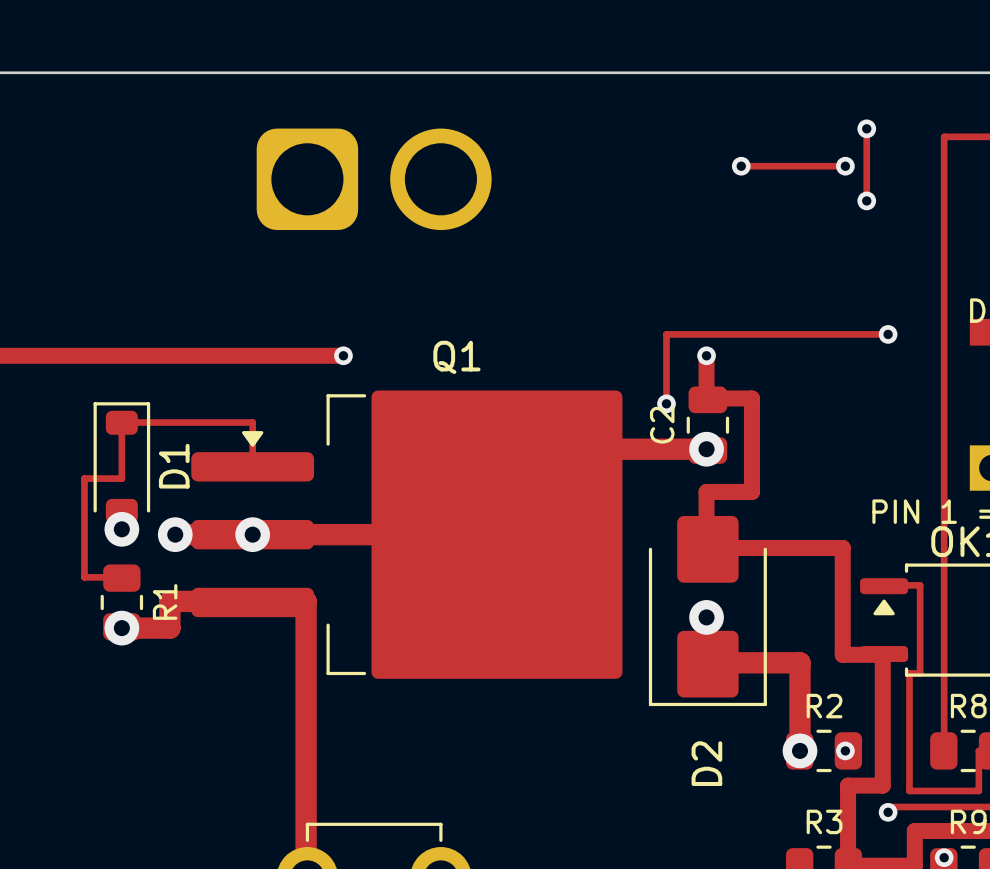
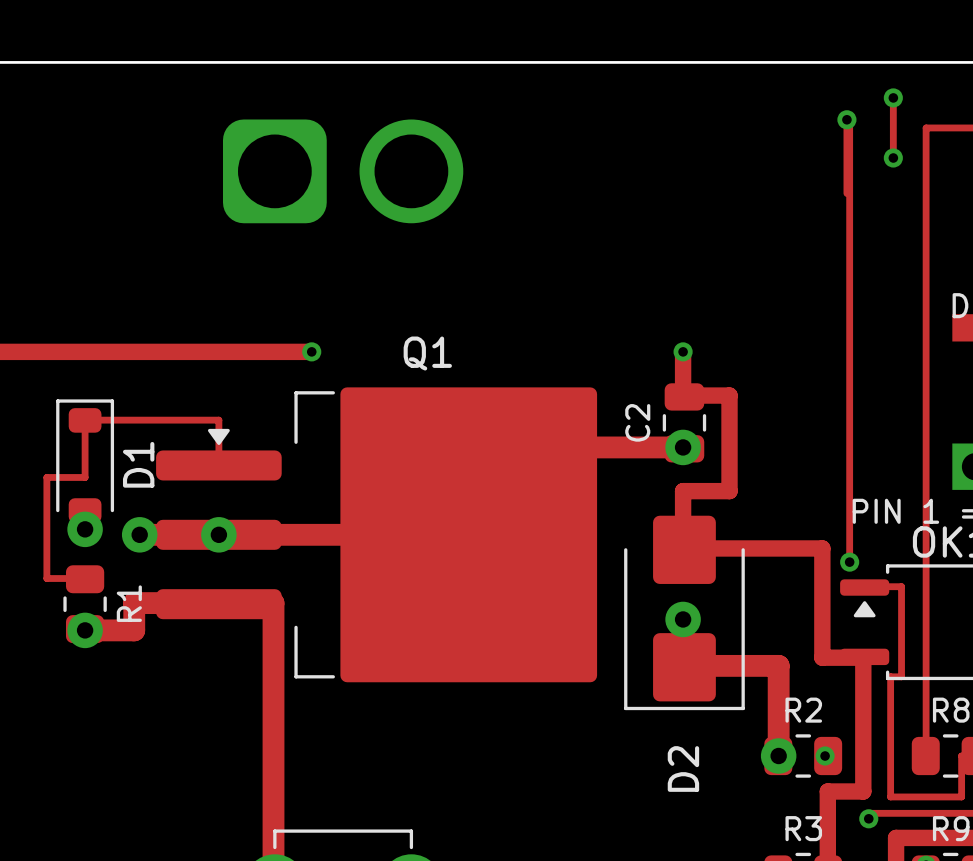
track: none -> (893, 97) (893, 158)
via: none -> (893, 97)
track: none -> (849, 119) (849, 562)
track: (741, 166) (845, 166) -> none
via: (741, 166) -> none
via: (845, 166) -> none
via: none -> (893, 158)
via: (866, 200) -> none
track: (888, 334) (666, 334) (666, 403) -> none
via: (888, 334) -> none
via: (666, 403) -> none
via: none -> (849, 562)

